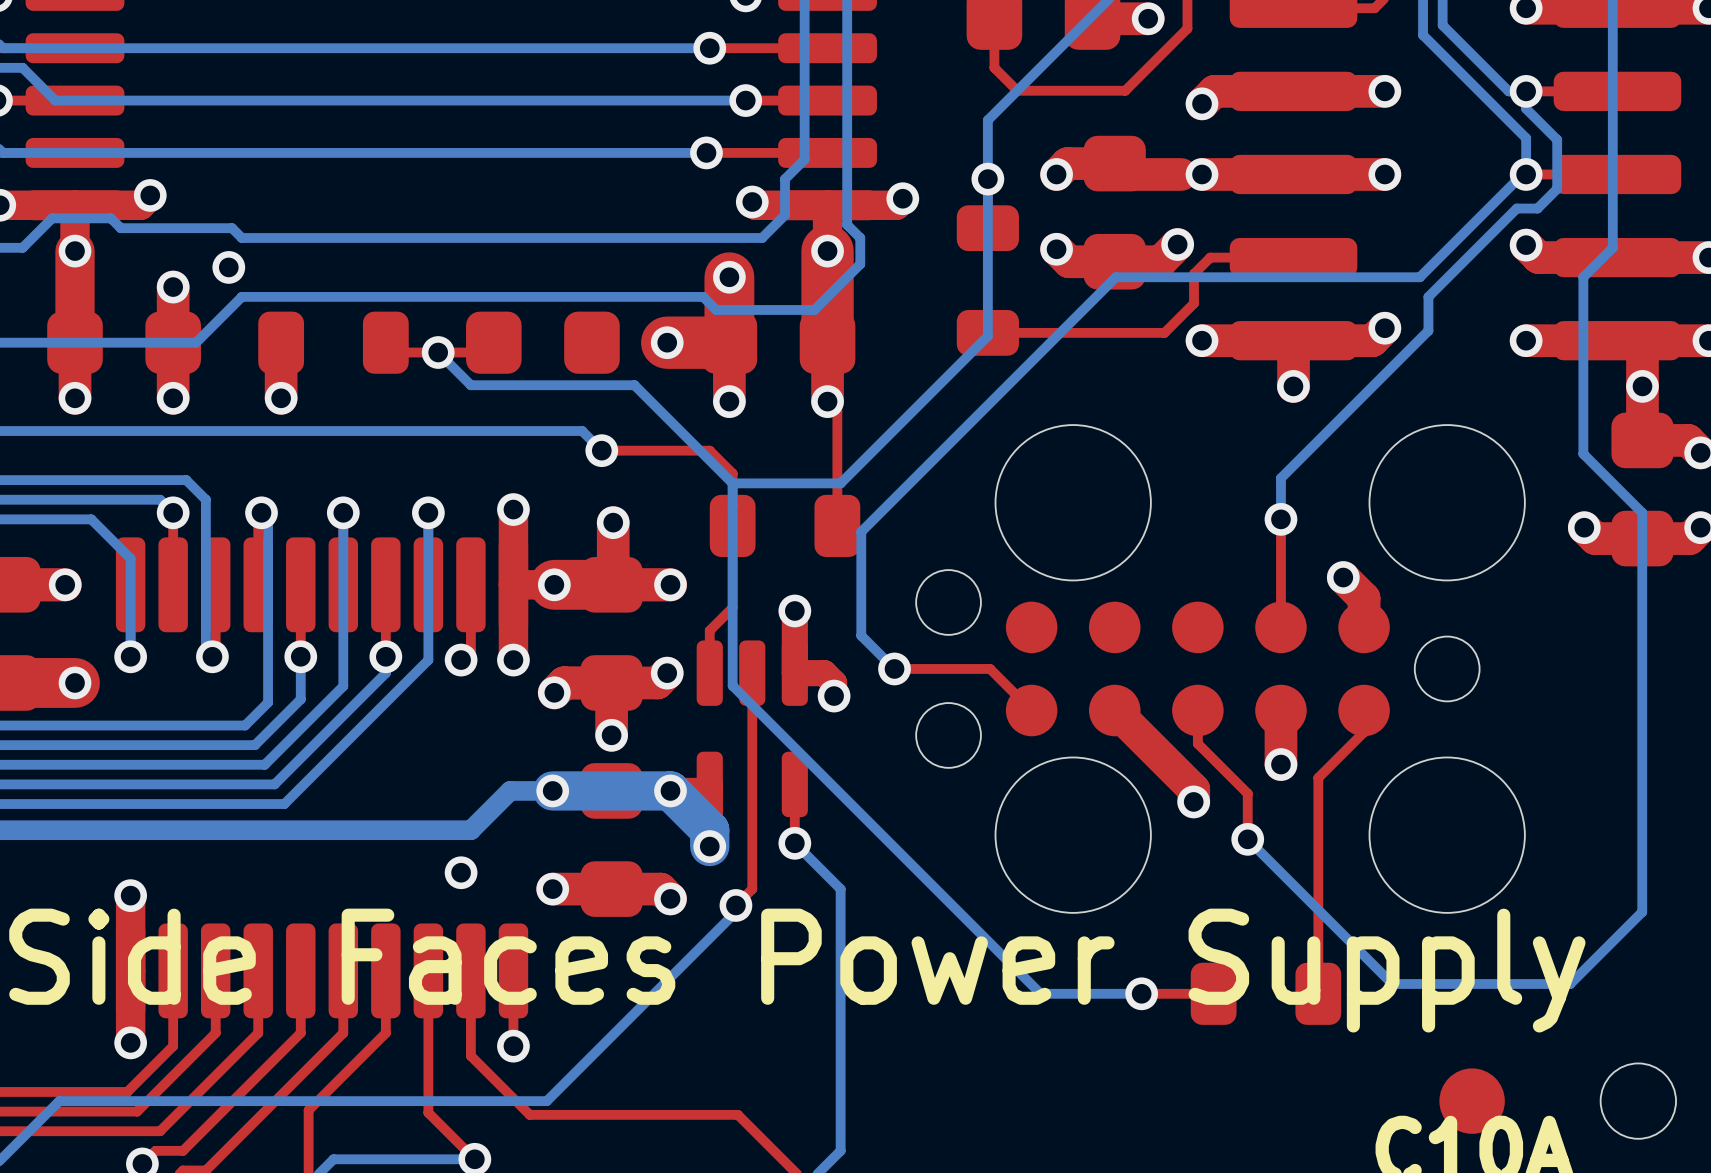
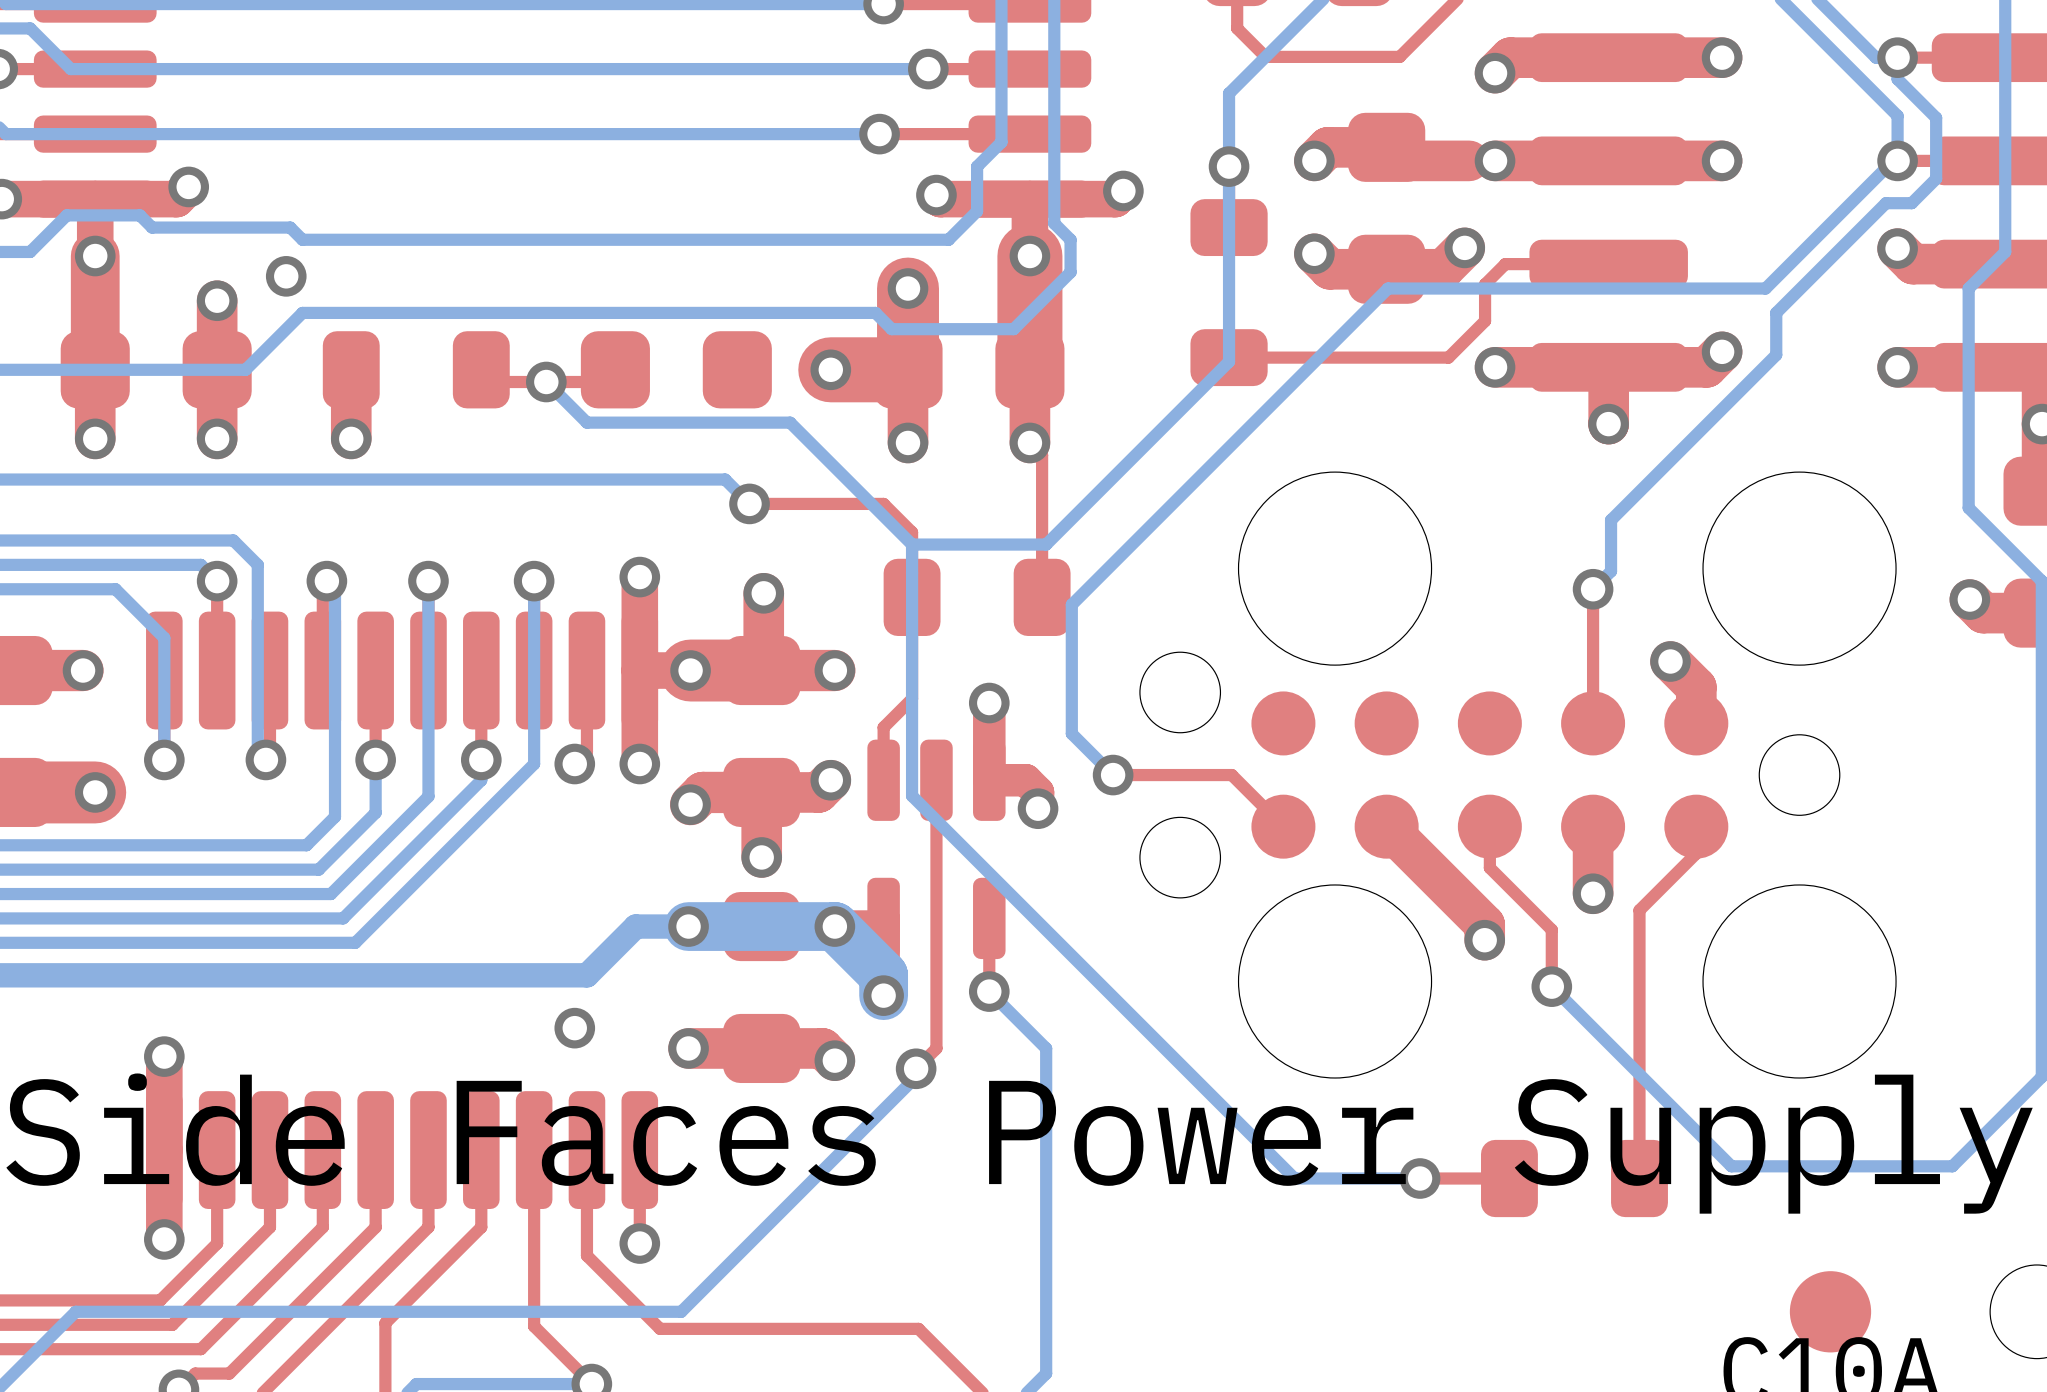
bottom track: (1295, 463) (1280, 478) (1280, 519) -> (1611, 520) (1611, 571) (1593, 589)

